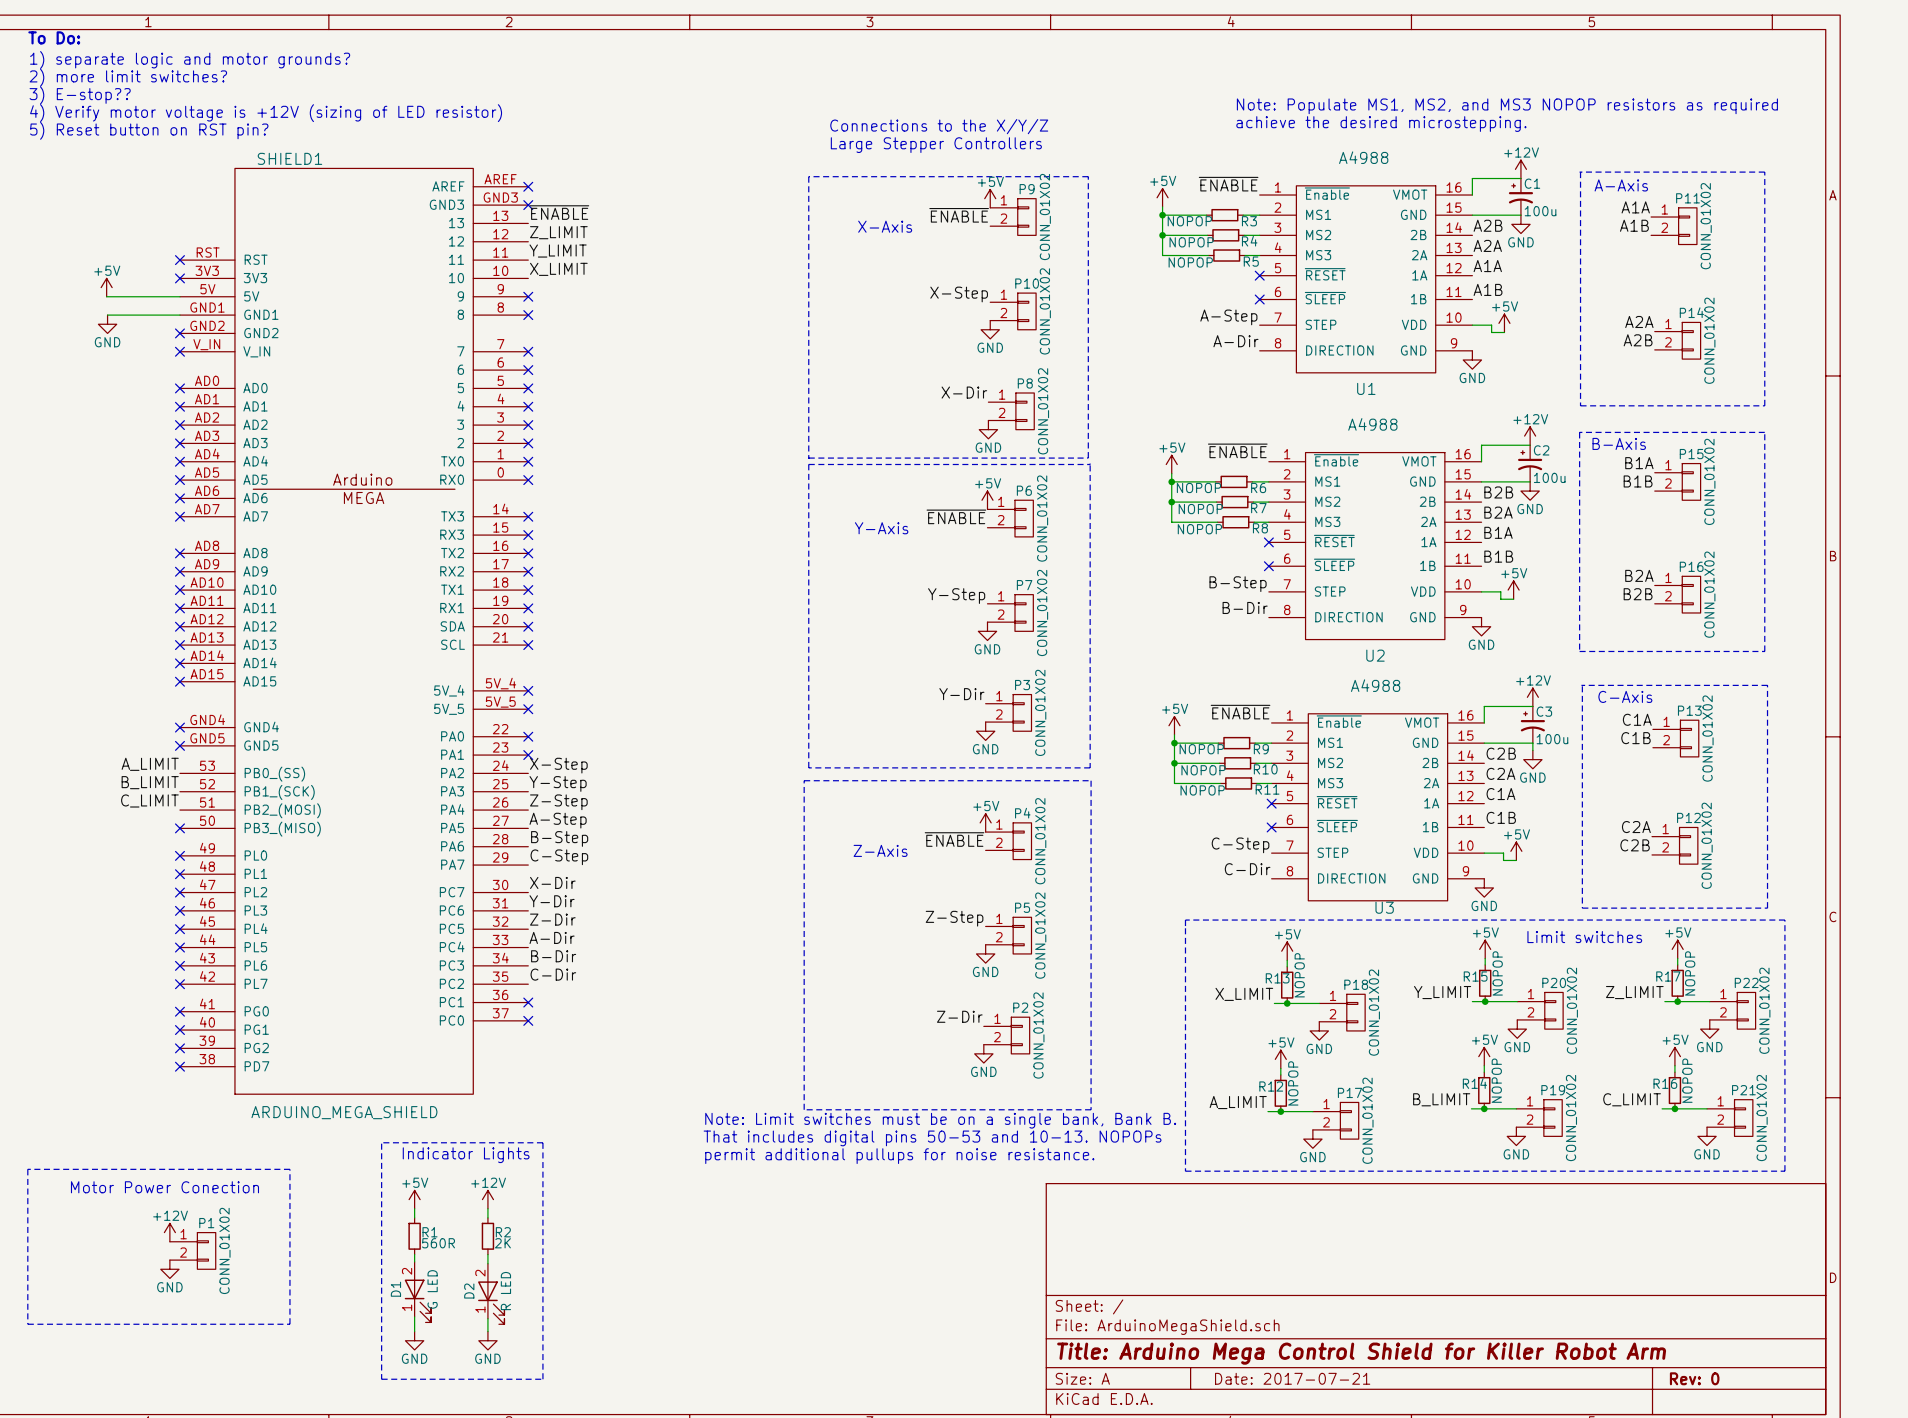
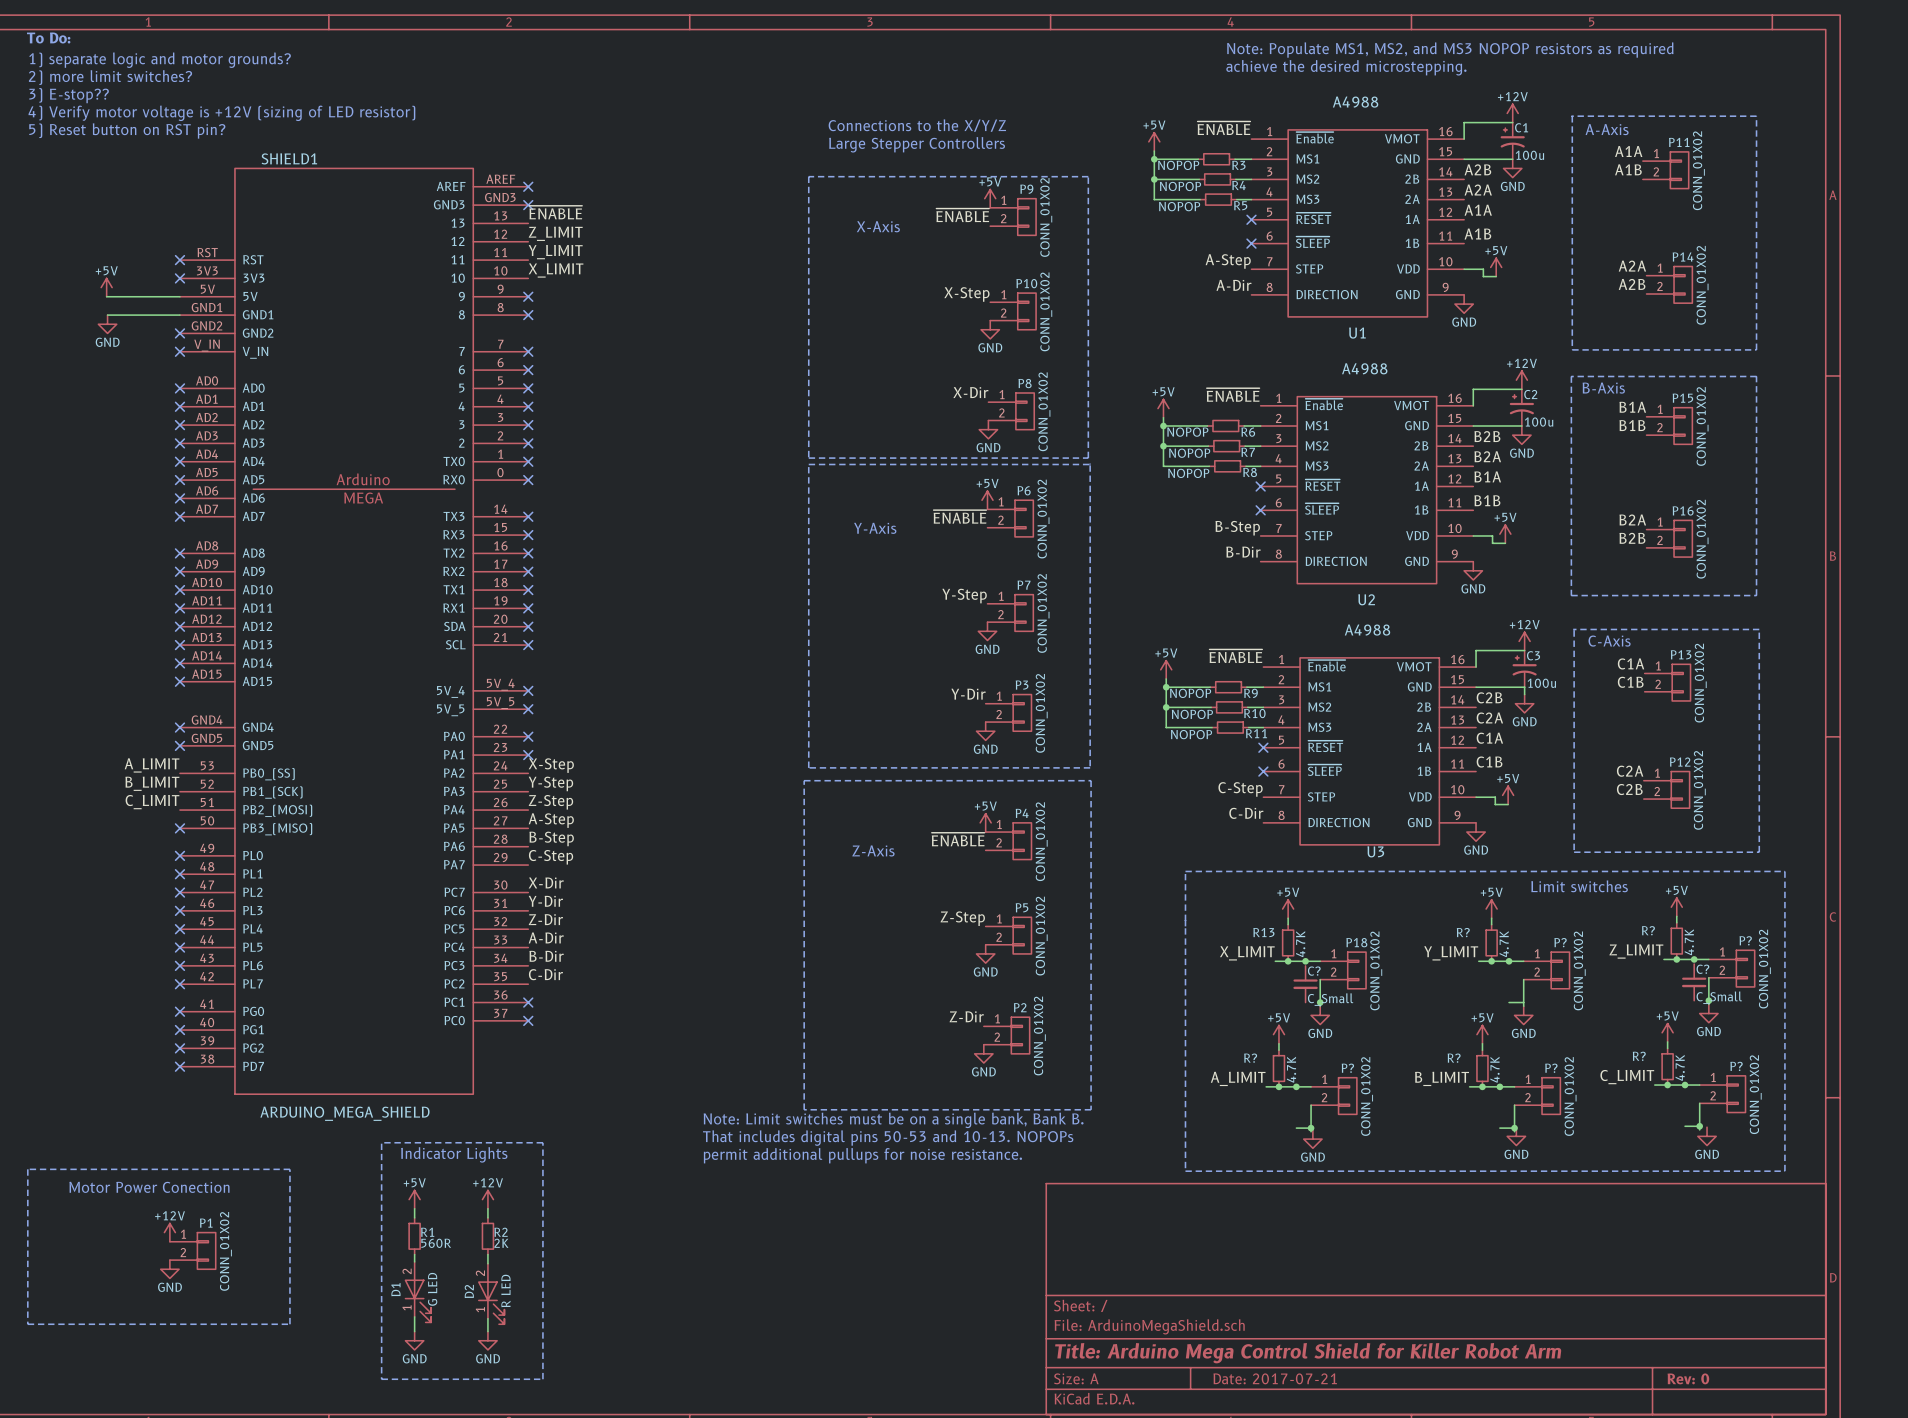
text position: Note: Populate MS1, MS2, and MS3 NOPOP resistors as required (1507, 106) -> Note: Populate MS1, MS2, and MS3 NOPOP resistors as required (1450, 50)
text position: achieve the desired microstepping. (1381, 124) -> achieve the desired microstepping. (1346, 67)
junction: none -> (1154, 159)
power symbol: none -> GND (1512, 168)
power symbol position: +12V (1520, 169) -> +12V (1512, 113)
line: (1579, 172) (1764, 172) (1764, 405) (1580, 405) (1580, 172) -> (1571, 116) (1756, 116) (1756, 349) (1572, 349) (1572, 116)
wire: (1520, 178) (1472, 178) (1472, 195) -> (1512, 122) (1464, 122) (1464, 139)
junction: none -> (1154, 179)
label position: ~{ENABLE} (1228, 184) -> ~{ENABLE} (1223, 128)
text position: A-Axis (1621, 185) -> A-Axis (1607, 129)
C1 position: (1520, 196) -> (1512, 140)
power symbol position: +5V (1162, 197) -> +5V (1154, 141)
wire: (1162, 206) (1162, 255) (1208, 255) -> (1154, 151) (1154, 199) (1200, 199)
label position: A1A (1635, 207) -> A1A (1628, 151)
wire: (1162, 215) (1206, 215) -> (1154, 159) (1198, 159)
junction: (1162, 215) -> none
R3 position: (1224, 215) -> (1216, 159)
wire: (1243, 215) (1259, 215) -> (1234, 159) (1251, 159)
wire: (1472, 215) (1520, 215) -> (1464, 159) (1512, 159)
no-connect mark: none -> (1251, 219)
power symbol: GND (1520, 224) -> none
label position: A2B (1488, 225) -> A2B (1477, 169)
label position: A1B (1634, 225) -> A1B (1628, 169)
P11 position: (1674, 226) -> (1665, 170)
wire: (1162, 235) (1207, 235) -> (1154, 179) (1199, 179)
junction: (1162, 235) -> none
R4 position: (1225, 235) -> (1217, 179)
wire: (1244, 235) (1259, 235) -> (1235, 179) (1251, 179)
no-connect mark: none -> (1251, 243)
label position: A2A (1487, 245) -> A2A (1478, 190)
R5 position: (1226, 255) -> (1218, 199)
wire: (1245, 255) (1259, 255) -> (1236, 199) (1251, 199)
label position: A1A (1487, 266) -> A1A (1478, 210)
no-connect mark: (1259, 275) -> none
U1 position: (1366, 279) -> (1357, 223)
label position: A1B (1488, 289) -> A1B (1477, 233)
no-connect mark: (1259, 299) -> none
power symbol: none -> GND (1464, 304)
label position: A-Step (1228, 317) -> A-Step (1228, 261)
label position: A2A (1639, 321) -> A2A (1632, 266)
power symbol position: +5V (1504, 323) -> +5V (1496, 267)
wire: (1472, 325) (1491, 325) (1491, 332) (1504, 332) -> (1464, 269) (1483, 269) (1483, 276) (1496, 276)
label position: A2B (1638, 340) -> A2B (1632, 284)
P14 position: (1677, 340) -> (1669, 284)
label position: A-Dir (1235, 341) -> A-Dir (1233, 285)
power symbol: GND (1472, 360) -> none
junction: none -> (1163, 425)
line: (1579, 432) (1764, 432) (1764, 651) (1579, 651) (1579, 432) -> (1571, 376) (1756, 376) (1756, 595) (1571, 595) (1571, 376)
power symbol: none -> GND (1521, 435)
power symbol position: +12V (1530, 436) -> +12V (1521, 380)
text position: B-Axis (1619, 443) -> B-Axis (1603, 388)
wire: (1530, 445) (1481, 445) (1481, 461) -> (1521, 389) (1473, 389) (1473, 405)
junction: none -> (1163, 446)
label position: ~{ENABLE} (1237, 450) -> ~{ENABLE} (1233, 394)
C2 position: (1530, 463) -> (1521, 407)
label position: B1A (1639, 463) -> B1A (1632, 407)
power symbol position: +5V (1171, 464) -> +5V (1163, 408)
wire: (1171, 473) (1171, 522) (1217, 522) -> (1163, 417) (1163, 466) (1209, 466)
wire: (1171, 481) (1215, 481) -> (1163, 425) (1207, 425)
junction: (1171, 481) -> none
R6 position: (1234, 481) -> (1225, 425)
wire: (1252, 481) (1268, 481) -> (1244, 425) (1260, 425)
wire: (1481, 481) (1530, 481) -> (1473, 425) (1521, 425)
label position: B1B (1638, 481) -> B1B (1632, 425)
P15 position: (1677, 481) -> (1669, 425)
no-connect mark: none -> (1260, 486)
power symbol: GND (1530, 491) -> none
label position: B2B (1498, 492) -> B2B (1487, 436)
wire: (1171, 502) (1216, 502) -> (1163, 446) (1208, 446)
junction: (1171, 502) -> none
R7 position: (1234, 502) -> (1226, 446)
wire: (1253, 502) (1268, 502) -> (1245, 446) (1260, 446)
no-connect mark: none -> (1260, 510)
label position: B2A (1498, 512) -> B2A (1487, 456)
R8 position: (1235, 522) -> (1227, 466)
wire: (1254, 522) (1268, 522) -> (1245, 466) (1260, 466)
label position: B1A (1498, 532) -> B1A (1487, 476)
no-connect mark: (1268, 542) -> none
U2 position: (1375, 546) -> (1366, 490)
label position: B1B (1498, 556) -> B1B (1487, 500)
no-connect mark: (1268, 566) -> none
power symbol: none -> GND (1473, 570)
label position: B2A (1639, 575) -> B2A (1632, 519)
label position: B-Step (1238, 584) -> B-Step (1237, 528)
power symbol position: +5V (1513, 590) -> +5V (1505, 534)
wire: (1481, 591) (1500, 591) (1500, 599) (1513, 599) -> (1473, 535) (1492, 535) (1492, 543) (1505, 543)
label position: B2B (1638, 594) -> B2B (1632, 538)
P16 position: (1677, 594) -> (1669, 538)
label position: B-Dir (1245, 607) -> B-Dir (1243, 552)
power symbol: GND (1481, 626) -> none
line: (1581, 685) (1767, 685) (1767, 908) (1582, 908) (1582, 686) -> (1573, 629) (1759, 629) (1759, 852) (1574, 852) (1574, 630)
junction: none -> (1166, 687)
text position: C-Axis (1625, 696) -> C-Axis (1609, 641)
power symbol position: +12V (1532, 697) -> +12V (1524, 641)
power symbol: none -> GND (1524, 703)
wire: (1532, 706) (1484, 706) (1484, 722) -> (1524, 650) (1476, 650) (1476, 667)
junction: none -> (1166, 707)
label position: ~{ENABLE} (1240, 712) -> ~{ENABLE} (1235, 656)
label position: C1A (1637, 719) -> C1A (1631, 663)
C3 position: (1532, 724) -> (1524, 668)
power symbol position: +5V (1174, 725) -> +5V (1166, 669)
wire: (1174, 734) (1174, 783) (1220, 783) -> (1166, 678) (1166, 727) (1212, 727)
label position: C1B (1635, 738) -> C1B (1630, 682)
P13 position: (1675, 738) -> (1667, 682)
wire: (1174, 743) (1218, 743) -> (1166, 687) (1210, 687)
junction: (1174, 743) -> none
R9 position: (1236, 743) -> (1228, 687)
wire: (1255, 743) (1271, 743) -> (1246, 687) (1263, 687)
wire: (1484, 743) (1532, 743) (1532, 750) -> (1476, 687) (1524, 687) (1524, 694)
no-connect mark: none -> (1263, 747)
label position: C2B (1501, 753) -> C2B (1489, 697)
power symbol: GND (1532, 759) -> none
wire: (1174, 763) (1219, 763) -> (1166, 707) (1211, 707)
junction: (1174, 763) -> none
R10 position: (1237, 763) -> (1229, 707)
wire: (1256, 763) (1271, 763) -> (1247, 707) (1263, 707)
no-connect mark: none -> (1263, 771)
label position: C2A (1500, 773) -> C2A (1489, 718)
R11 position: (1238, 783) -> (1230, 727)
wire: (1256, 783) (1271, 783) -> (1248, 727) (1263, 727)
label position: C1A (1500, 794) -> C1A (1489, 738)
power symbol: none -> +5V (1508, 795)
no-connect mark: (1271, 803) -> none
U3 position: (1377, 807) -> (1369, 751)
label position: C1B (1501, 817) -> C1B (1489, 762)
no-connect mark: (1271, 827) -> none
label position: C2A (1636, 827) -> C2A (1630, 771)
power symbol: none -> GND (1476, 832)
label position: C-Step (1240, 845) -> C-Step (1240, 789)
label position: C2B (1635, 845) -> C2B (1629, 789)
P12 position: (1674, 845) -> (1666, 789)
power symbol: +5V (1516, 851) -> none
wire: (1484, 853) (1503, 853) (1503, 860) (1516, 860) -> (1476, 797) (1495, 797) (1495, 804) (1508, 804)
label position: C-Dir (1247, 869) -> C-Dir (1246, 813)
power symbol: GND (1484, 887) -> none
power symbol: none -> +5V (1676, 907)
power symbol: none -> +5V (1288, 909)
power symbol: none -> +5V (1491, 909)
line: (1185, 920) (1784, 920) -> (1185, 920) (1185, 871) (1784, 871) (1784, 920)
text position: Limit switches (1584, 937) -> Limit switches (1579, 886)
R?: none -> 4.7K (1676, 941)
R?: none -> 4.7K (1491, 942)
power symbol: +5V (1485, 949) -> none
power symbol: +5V (1677, 949) -> none
power symbol: +5V (1287, 951) -> none
wire: (1485, 958) (1485, 964) -> (1491, 918) (1491, 924)
junction: none -> (1676, 959)
junction: none -> (1694, 959)
junction: none -> (1288, 961)
junction: none -> (1305, 961)
junction: none -> (1491, 961)
junction: none -> (1509, 961)
P?: none -> CONN_01X02 (1731, 968)
P?: none -> CONN_01X02 (1546, 970)
R13 value: NOPOP (1299, 975) -> 4.7K (1300, 944)
wire: none -> (1708, 977) (1708, 1004)
R13 name position: R13 (1277, 978) -> R13 (1263, 932)
wire: none -> (1320, 979) (1320, 1006)
wire: none -> (1523, 979) (1523, 1006)
C?: none -> C_Small (1694, 982)
R15: NOPOP (1485, 983) -> none
R17: NOPOP (1677, 983) -> none
C?: none -> C_Small (1305, 984)
R13 position: (1287, 985) -> (1288, 942)
label position: Y_LIMIT (1442, 992) -> Y_LIMIT (1451, 953)
label position: Z_LIMIT (1634, 992) -> Z_LIMIT (1636, 951)
label position: X_LIMIT (1244, 994) -> X_LIMIT (1247, 953)
junction: none -> (1708, 1000)
wire: (1472, 1001) (1517, 1001) -> (1478, 961) (1523, 961)
junction: (1485, 1001) -> none
wire: (1664, 1001) (1709, 1001) -> (1663, 959) (1708, 959)
junction: (1677, 1001) -> none
junction: none -> (1320, 1002)
wire: none -> (1509, 1002) (1523, 1002)
wire: (1274, 1003) (1319, 1003) -> (1275, 961) (1320, 961)
junction: (1287, 1003) -> none
P20: CONN_01X02 (1540, 1010) -> none
P22: CONN_01X02 (1732, 1010) -> none
P18 position: (1342, 1012) -> (1343, 970)
power symbol position: GND (1517, 1029) -> GND (1523, 1015)
power symbol position: GND (1709, 1029) -> GND (1708, 1013)
power symbol position: GND (1319, 1030) -> GND (1320, 1015)
power symbol position: +5V (1484, 1056) -> +5V (1482, 1034)
power symbol position: +5V (1674, 1056) -> +5V (1667, 1032)
power symbol position: +5V (1280, 1059) -> +5V (1278, 1034)
wire: (1484, 1065) (1484, 1072) -> (1482, 1043) (1482, 1050)
wire: (1674, 1065) (1674, 1072) -> (1667, 1041) (1667, 1048)
R?: none -> 4.7K (1667, 1066)
R?: none -> 4.7K (1278, 1068)
wire: (1280, 1068) (1280, 1074) -> (1278, 1043) (1278, 1050)
R?: none -> 4.7K (1482, 1068)
junction: none -> (1667, 1085)
junction: none -> (1685, 1085)
junction: none -> (1278, 1086)
junction: none -> (1296, 1086)
junction: none -> (1482, 1086)
junction: none -> (1499, 1086)
R14: NOPOP (1484, 1090) -> none
R16: NOPOP (1674, 1090) -> none
R12: NOPOP (1280, 1093) -> none
P?: none -> CONN_01X02 (1722, 1094)
P?: none -> CONN_01X02 (1333, 1096)
P?: none -> CONN_01X02 (1537, 1096)
label position: B_LIMIT (1441, 1099) -> B_LIMIT (1442, 1078)
label position: C_LIMIT (1632, 1099) -> C_LIMIT (1627, 1077)
label position: A_LIMIT (1238, 1102) -> A_LIMIT (1238, 1078)
wire: none -> (1699, 1103) (1699, 1129)
wire: none -> (1311, 1105) (1311, 1131)
wire: none -> (1514, 1105) (1514, 1131)
wire: (1471, 1108) (1516, 1108) -> (1469, 1086) (1514, 1086)
junction: (1484, 1108) -> none
wire: (1662, 1108) (1707, 1108) -> (1654, 1085) (1699, 1085)
junction: (1674, 1108) -> none
wire: (1267, 1111) (1312, 1111) -> (1266, 1086) (1311, 1086)
junction: (1280, 1111) -> none
P19: CONN_01X02 (1539, 1118) -> none
P21: CONN_01X02 (1729, 1118) -> none
P17: CONN_01X02 (1335, 1120) -> none
wire: none -> (1685, 1126) (1699, 1126)
junction: none -> (1699, 1126)
wire: none -> (1296, 1128) (1311, 1128)
junction: none -> (1311, 1128)
wire: none -> (1499, 1128) (1514, 1128)
junction: none -> (1514, 1128)

